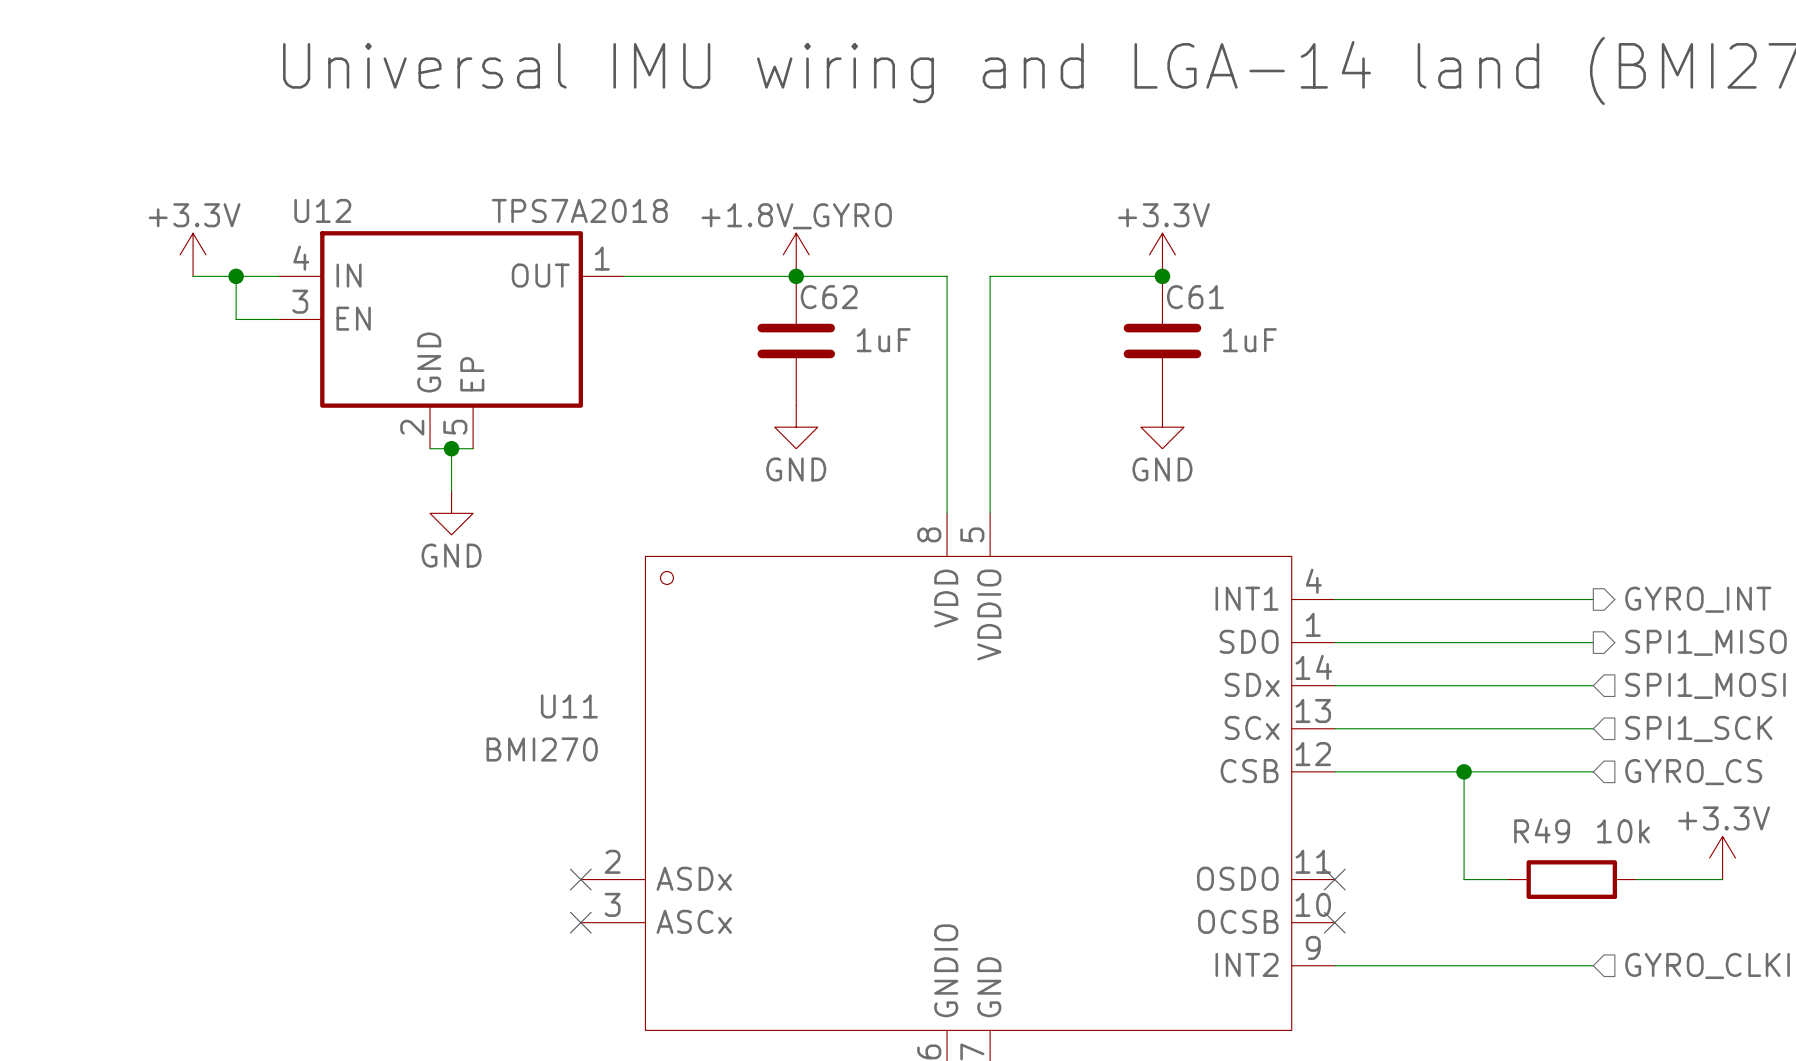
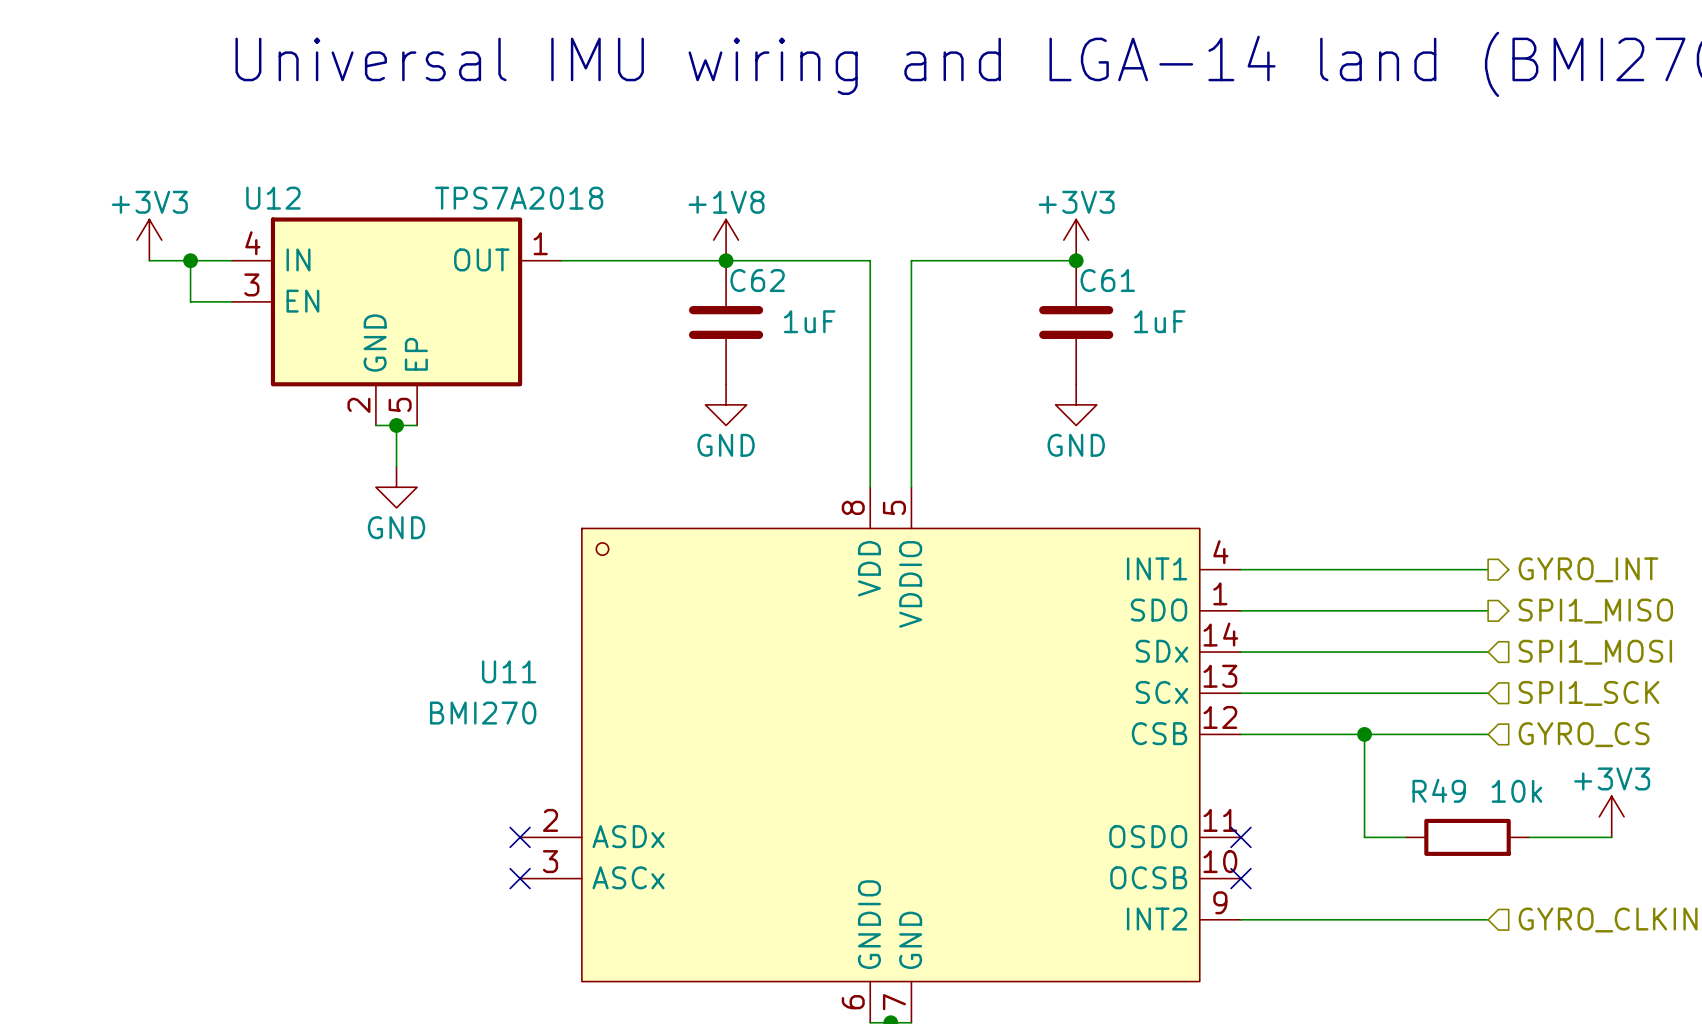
power symbol: +3.3V (193, 254) -> +3V3 (149, 240)
power symbol: +1.8V_GYRO (796, 254) -> +1V8 (726, 240)
power symbol: +3.3V (1162, 254) -> +3V3 (1076, 240)
power symbol: +3.3V (1722, 858) -> +3V3 (1611, 816)

